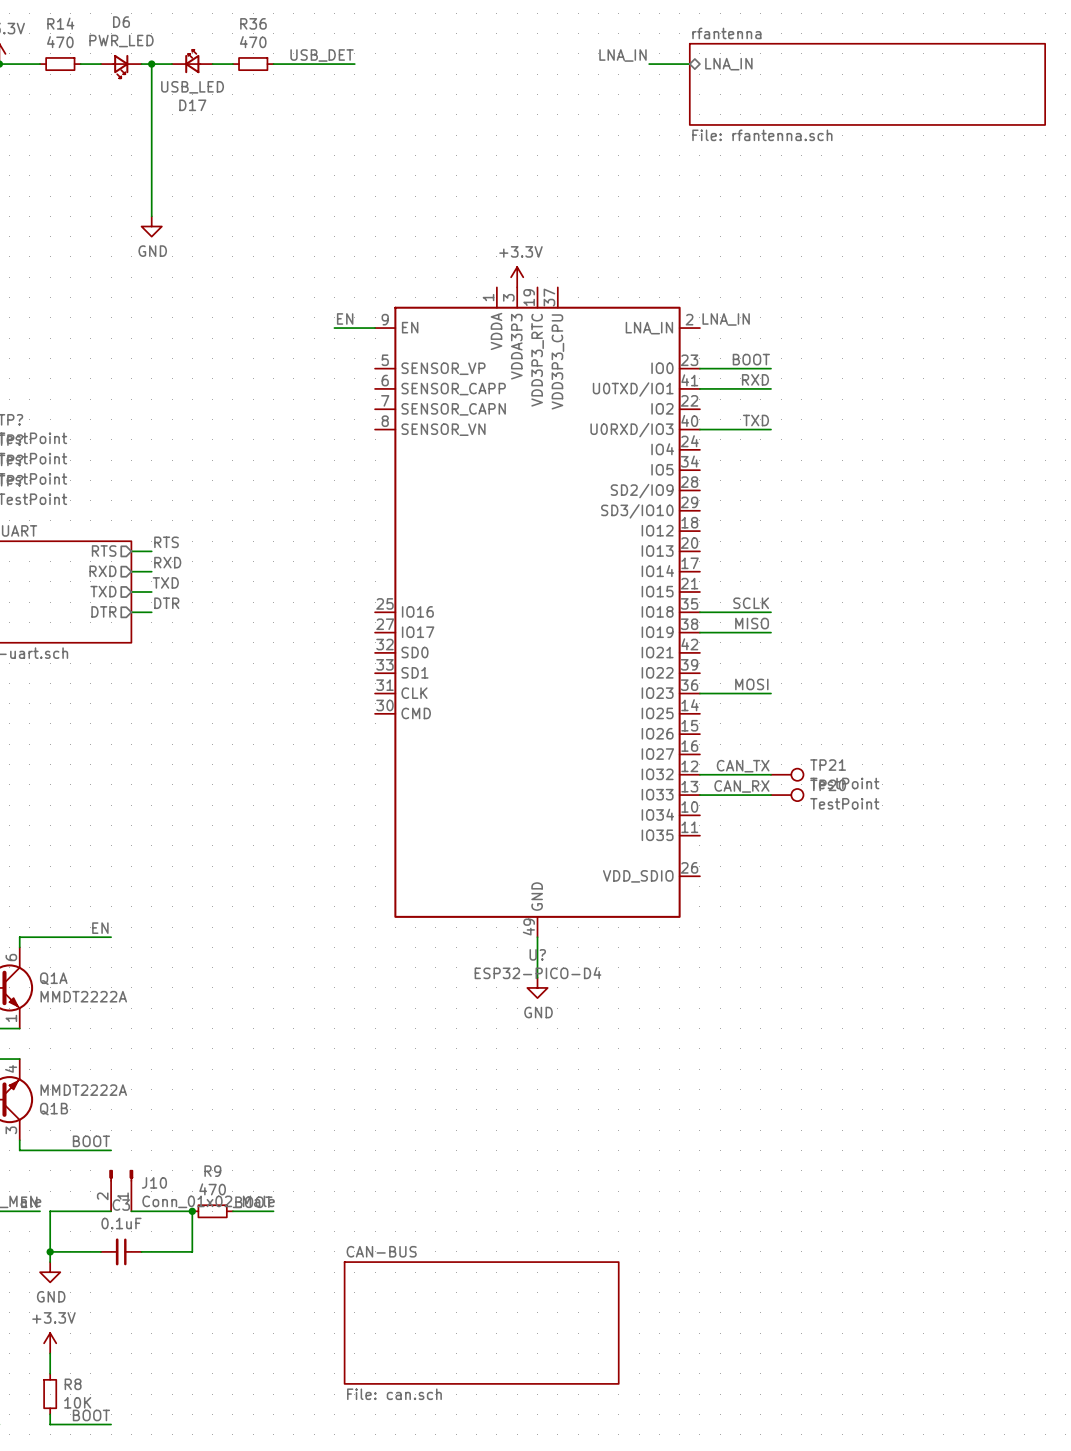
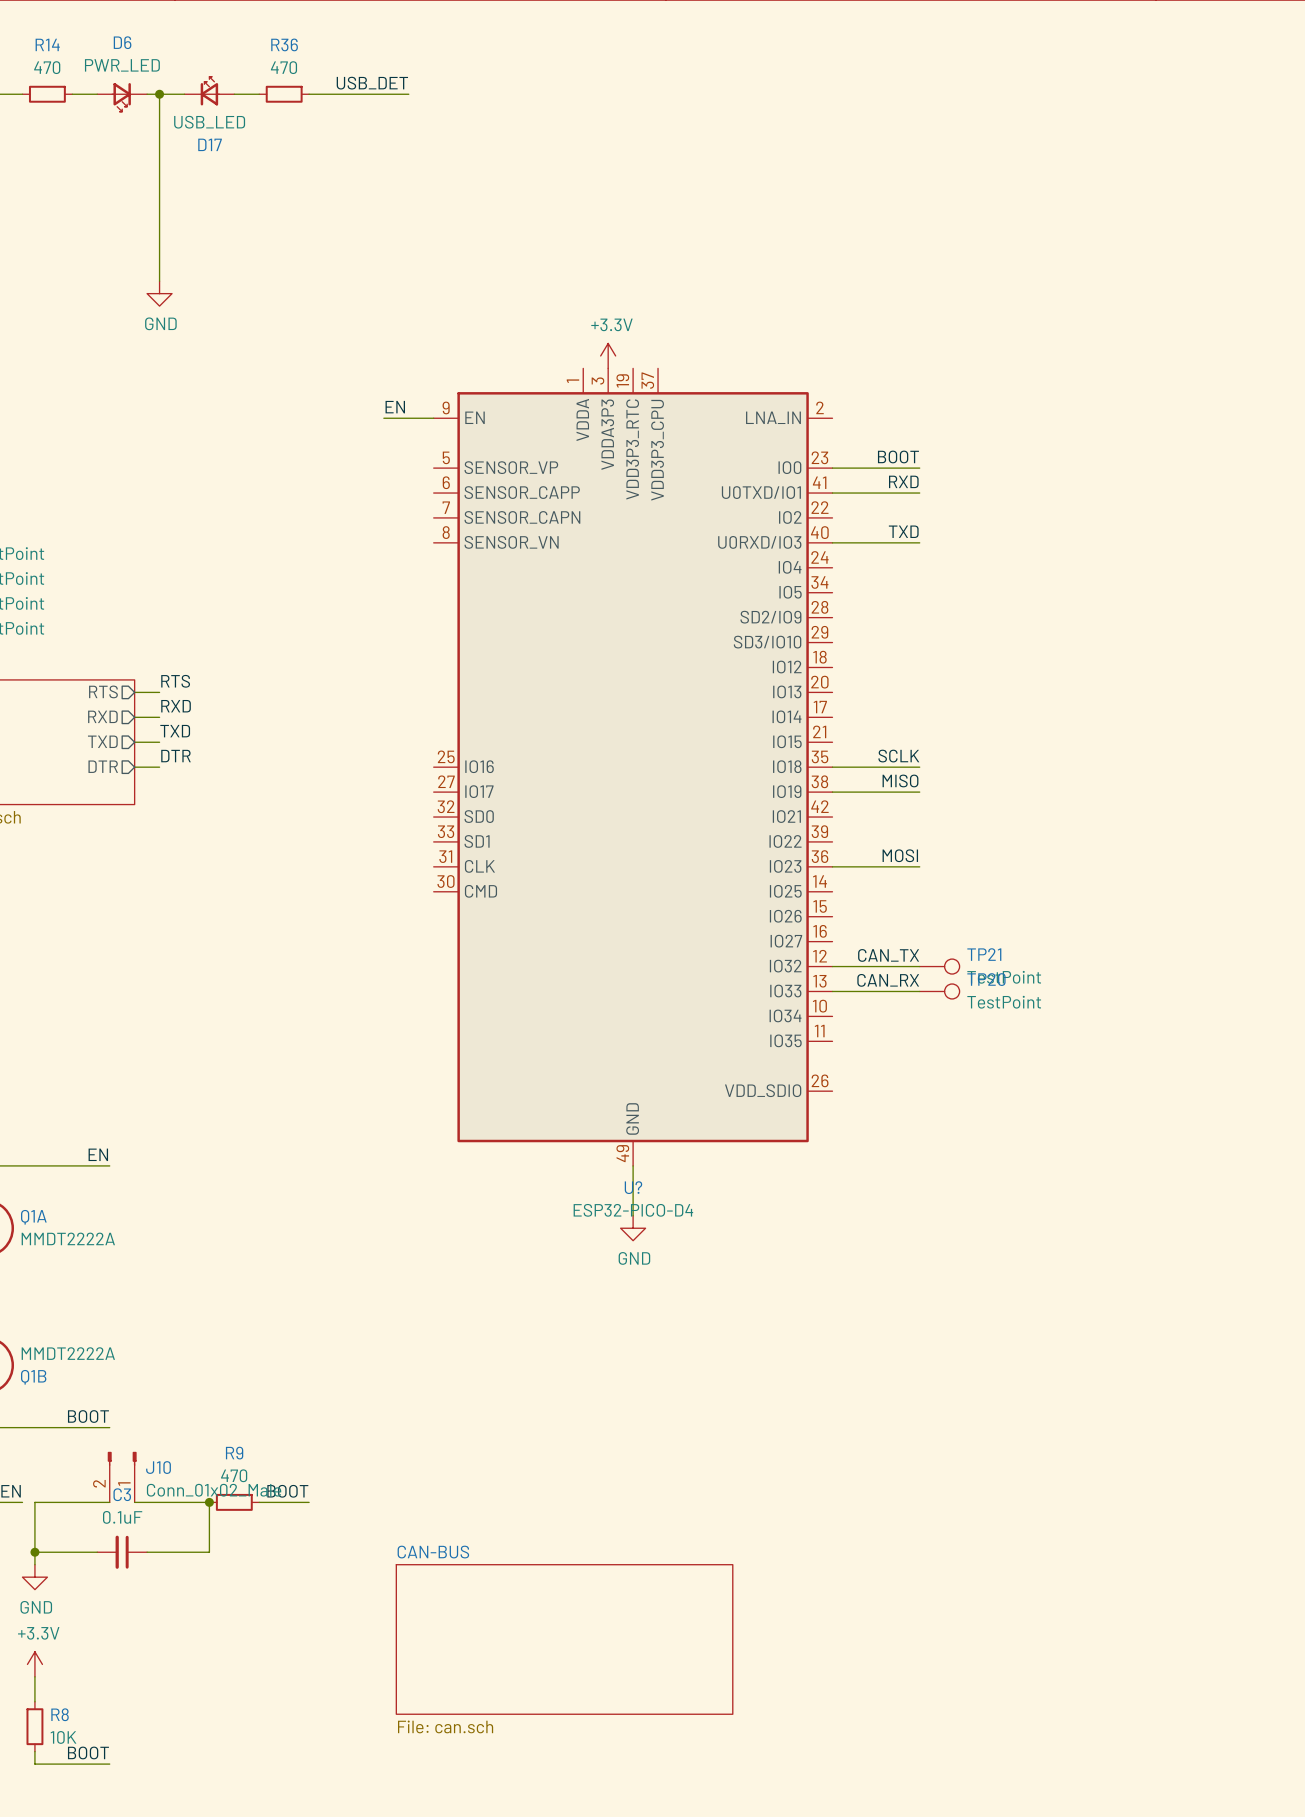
label: LNA_IN (623, 55) -> none
wire: (649, 64) (689, 64) -> none
sheet pin: LNA_IN (728, 64) -> none
sheet rfantenna: File: rfantenna.sch (867, 84) -> none
label: LNA_IN (726, 319) -> none

